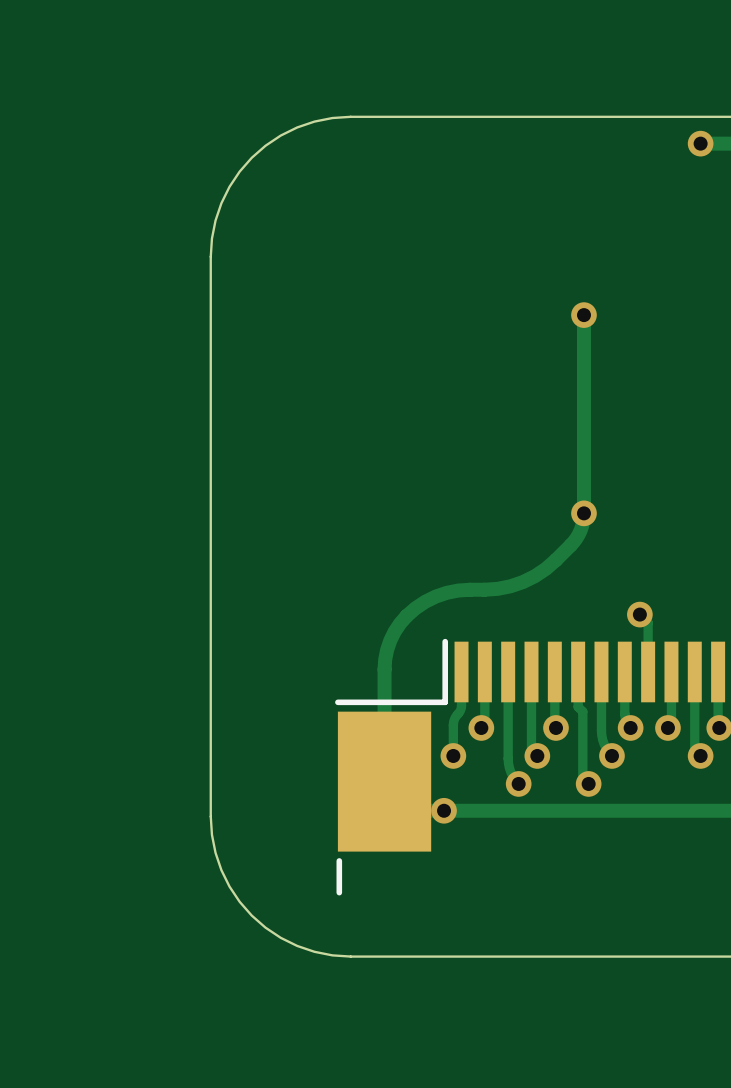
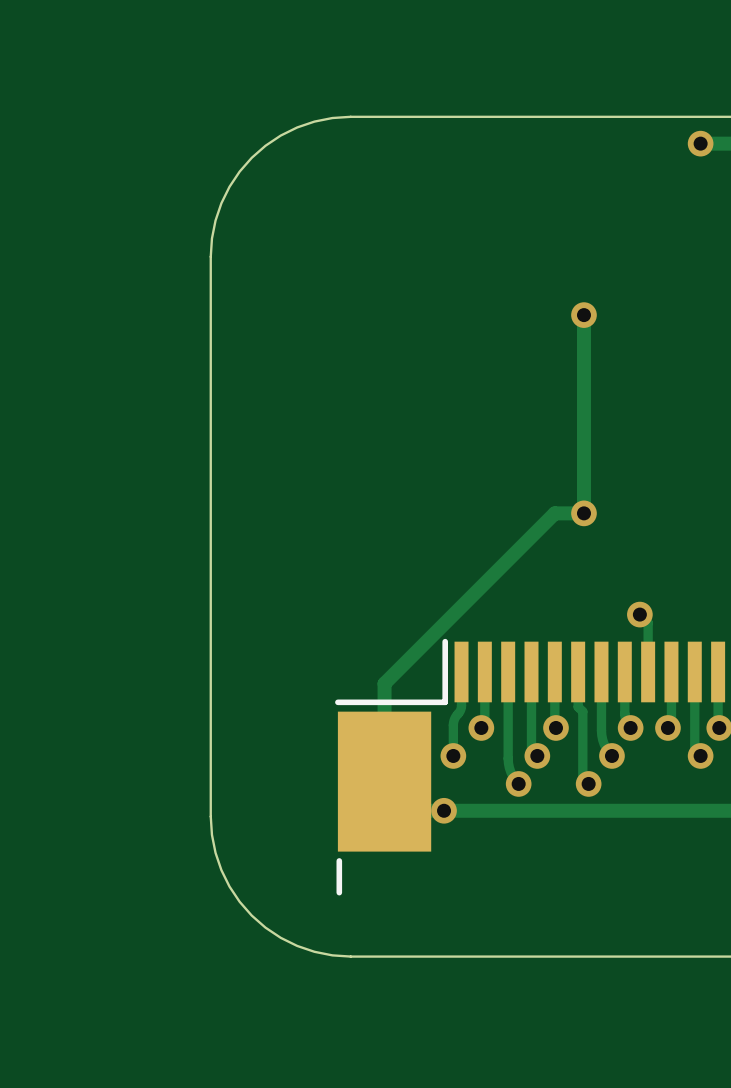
track: (583, 513) (580, 530) (573, 541) (555, 560) (534, 576) (510, 586) (497, 588) (446, 592) (425, 601) (415, 608) (400, 623) (390, 640) (385, 659) (384, 683) -> (583, 513) (554, 513) (384, 683)

